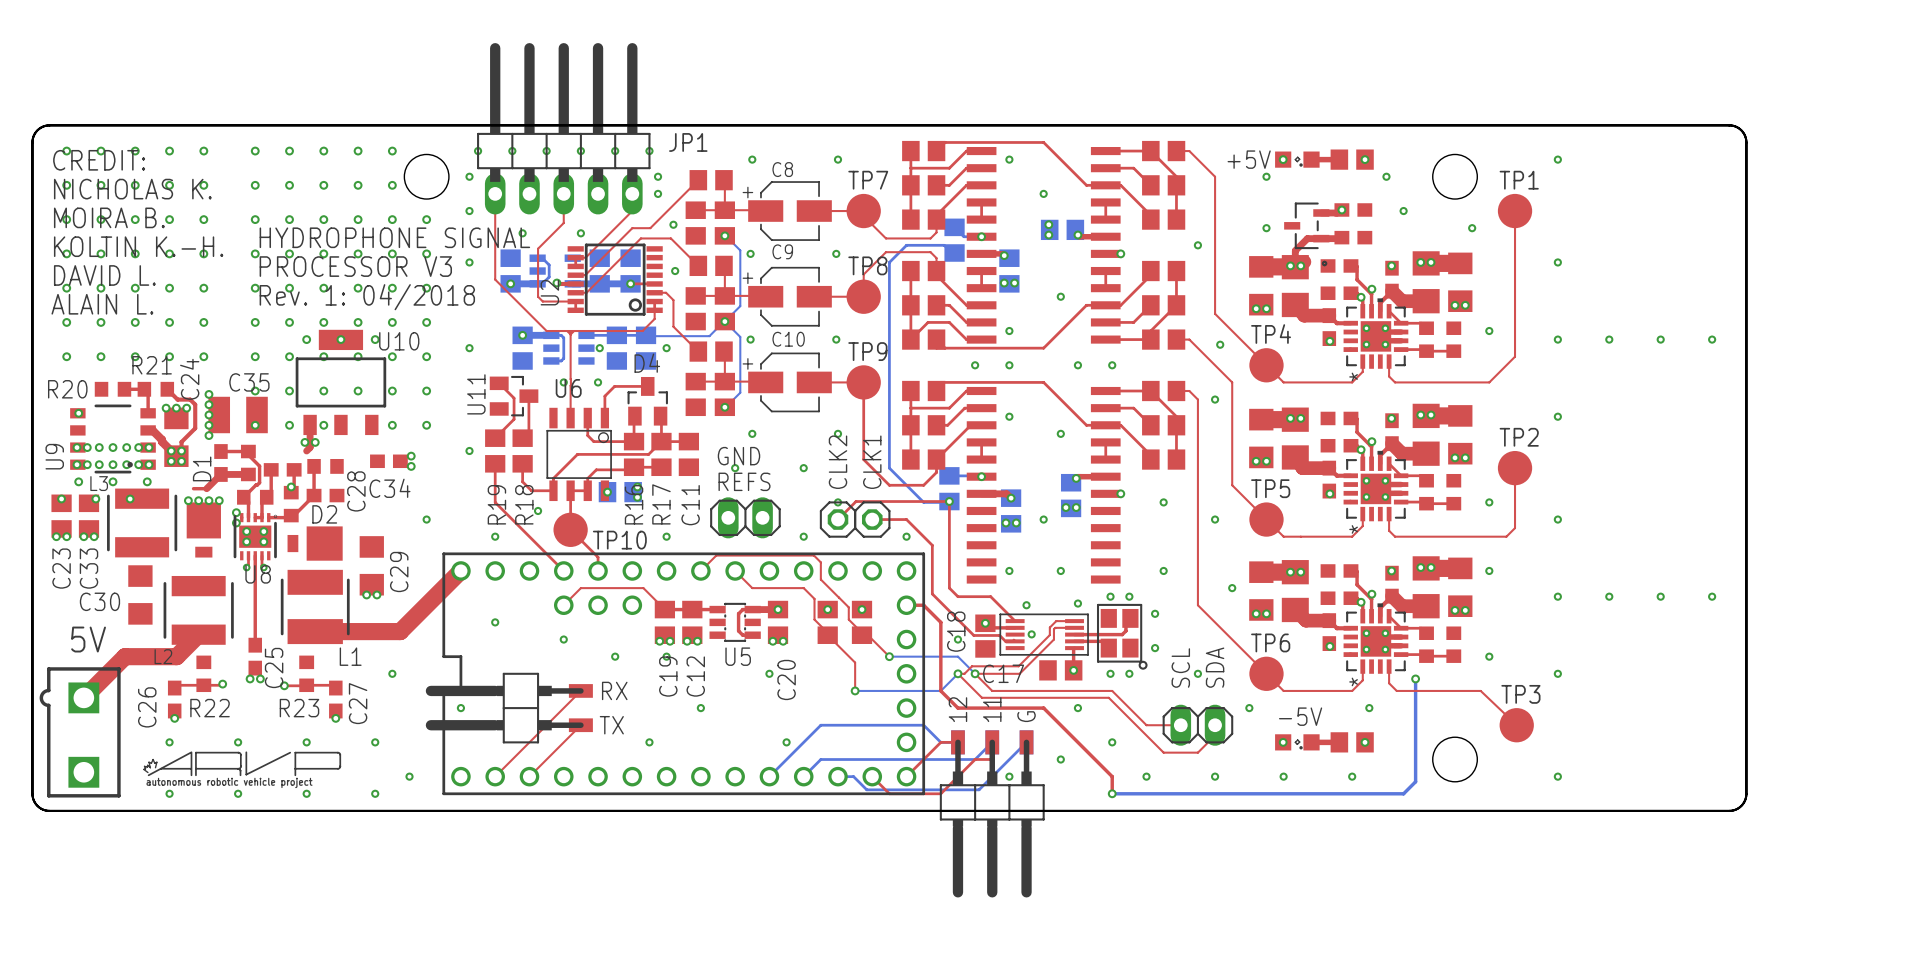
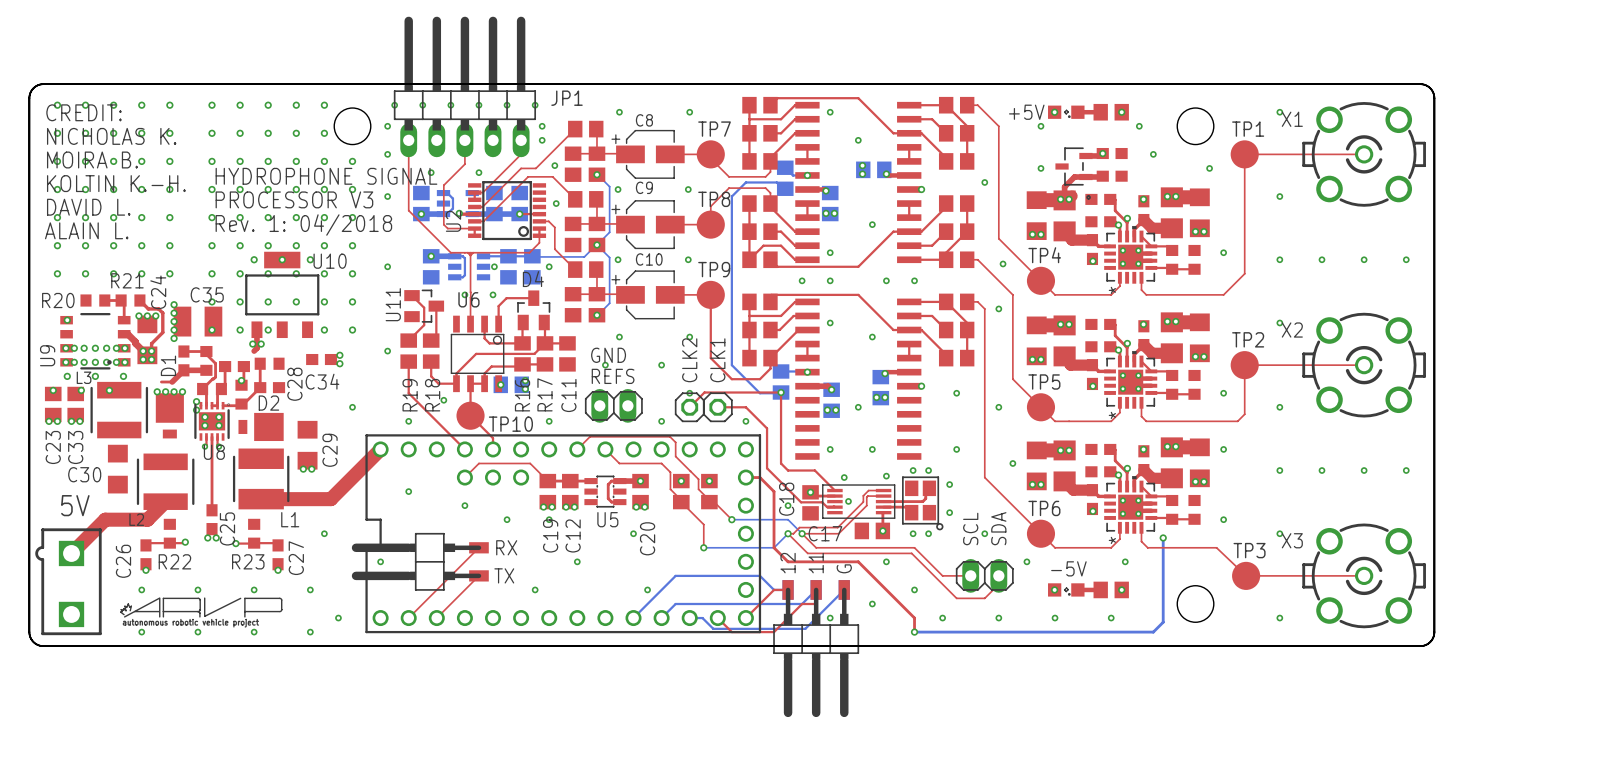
top track: none -> (1244, 154) (1364, 154)
X1: none -> (1364, 154)
top track: none -> (1244, 365) (1364, 365)
X2: none -> (1364, 365)
top track: none -> (1246, 575) (1364, 575)
X3: none -> (1364, 575)

